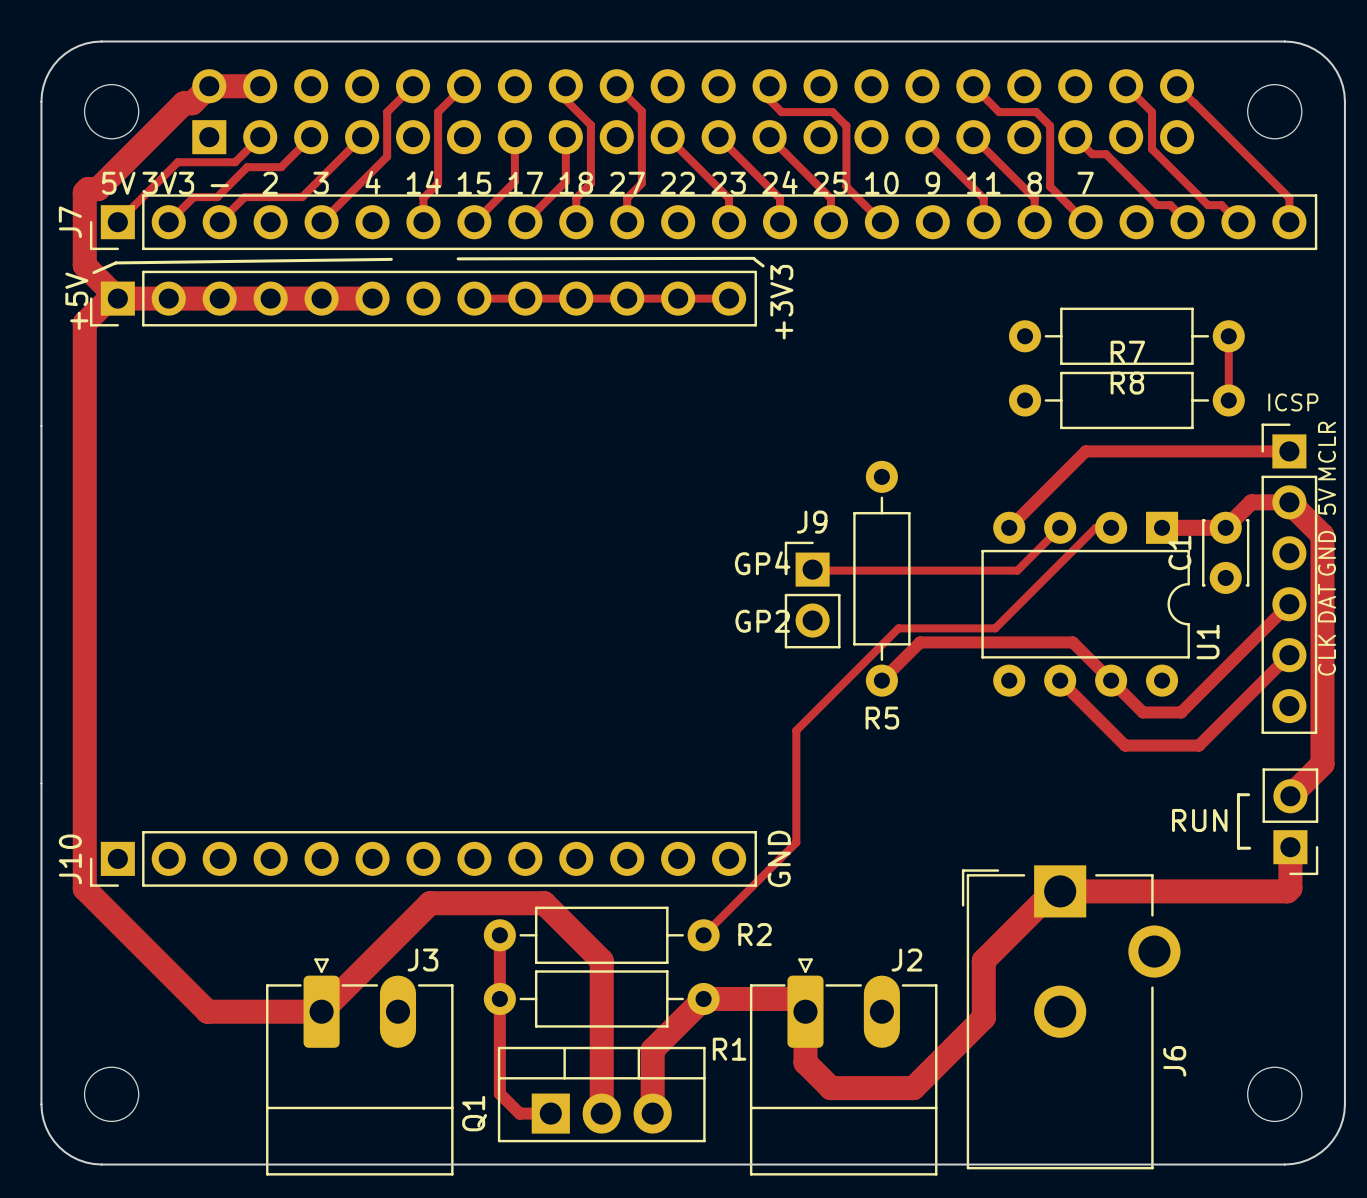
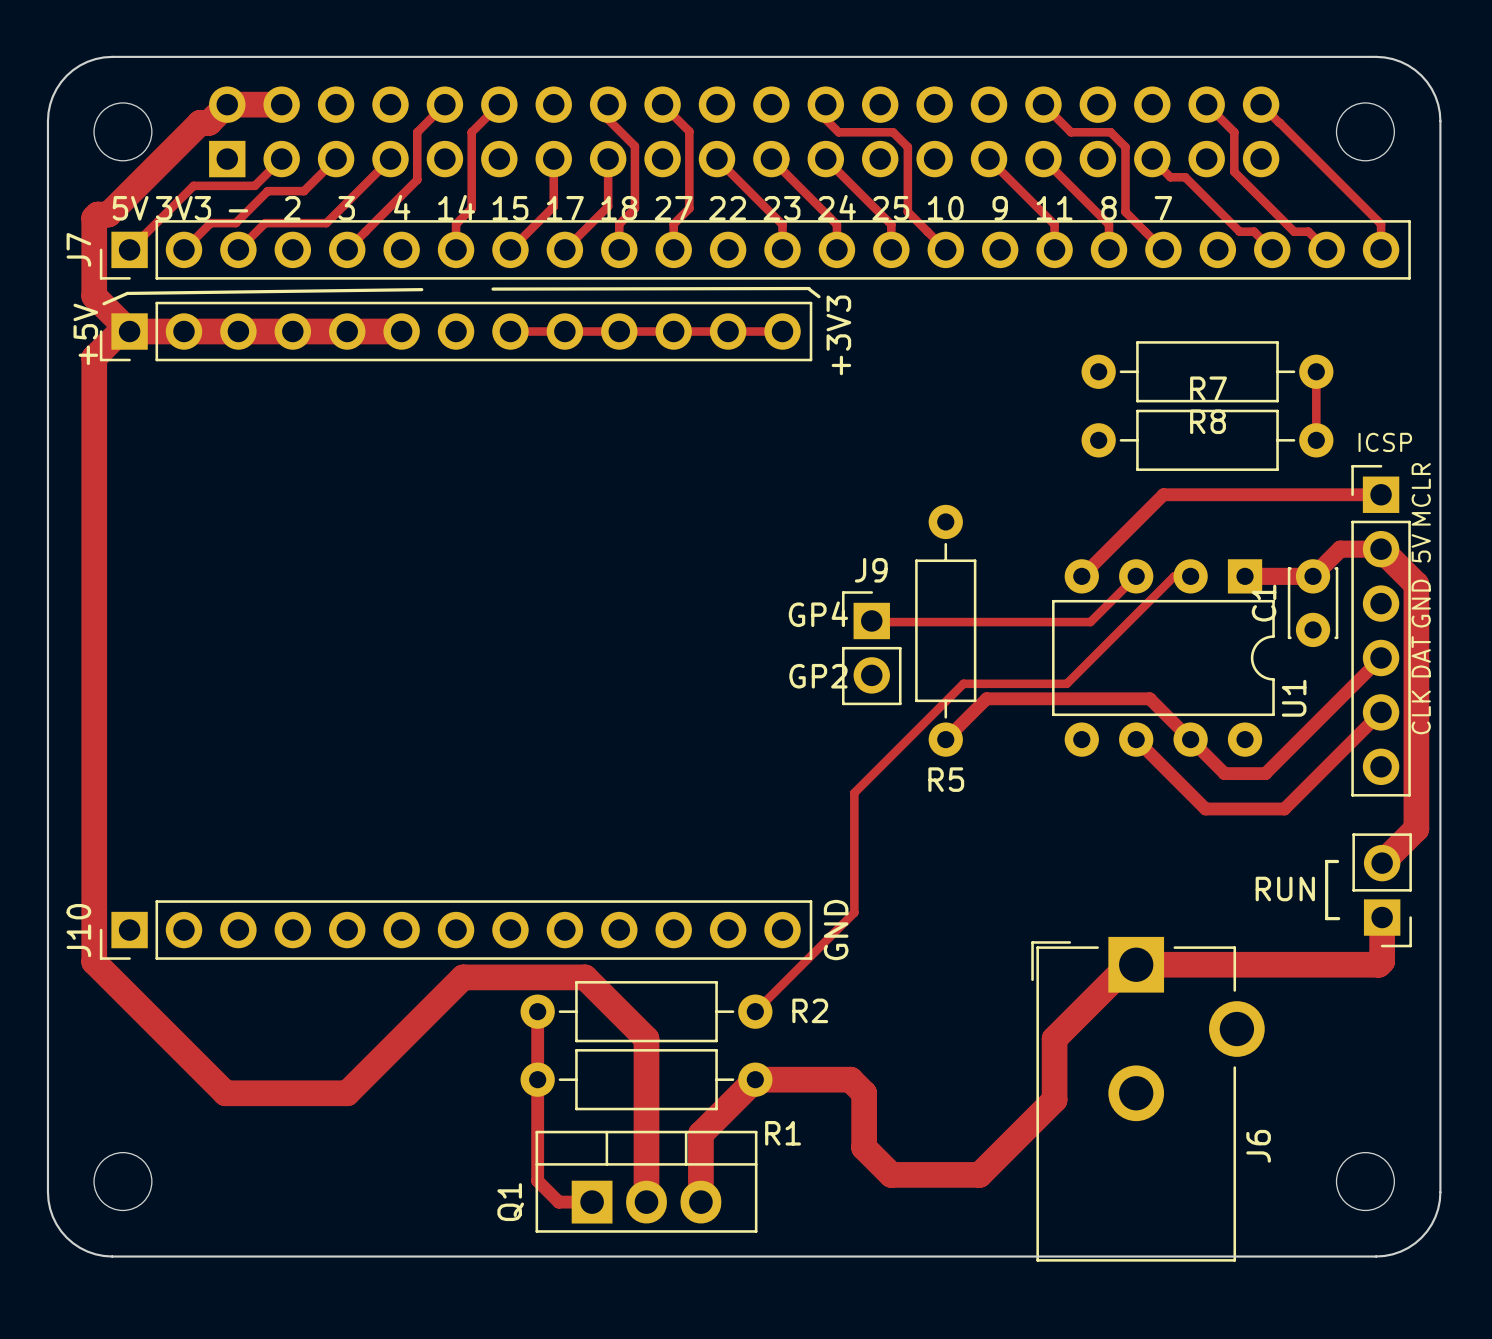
J3: (359, 1066) -> none
J2: (843, 1066) -> none

